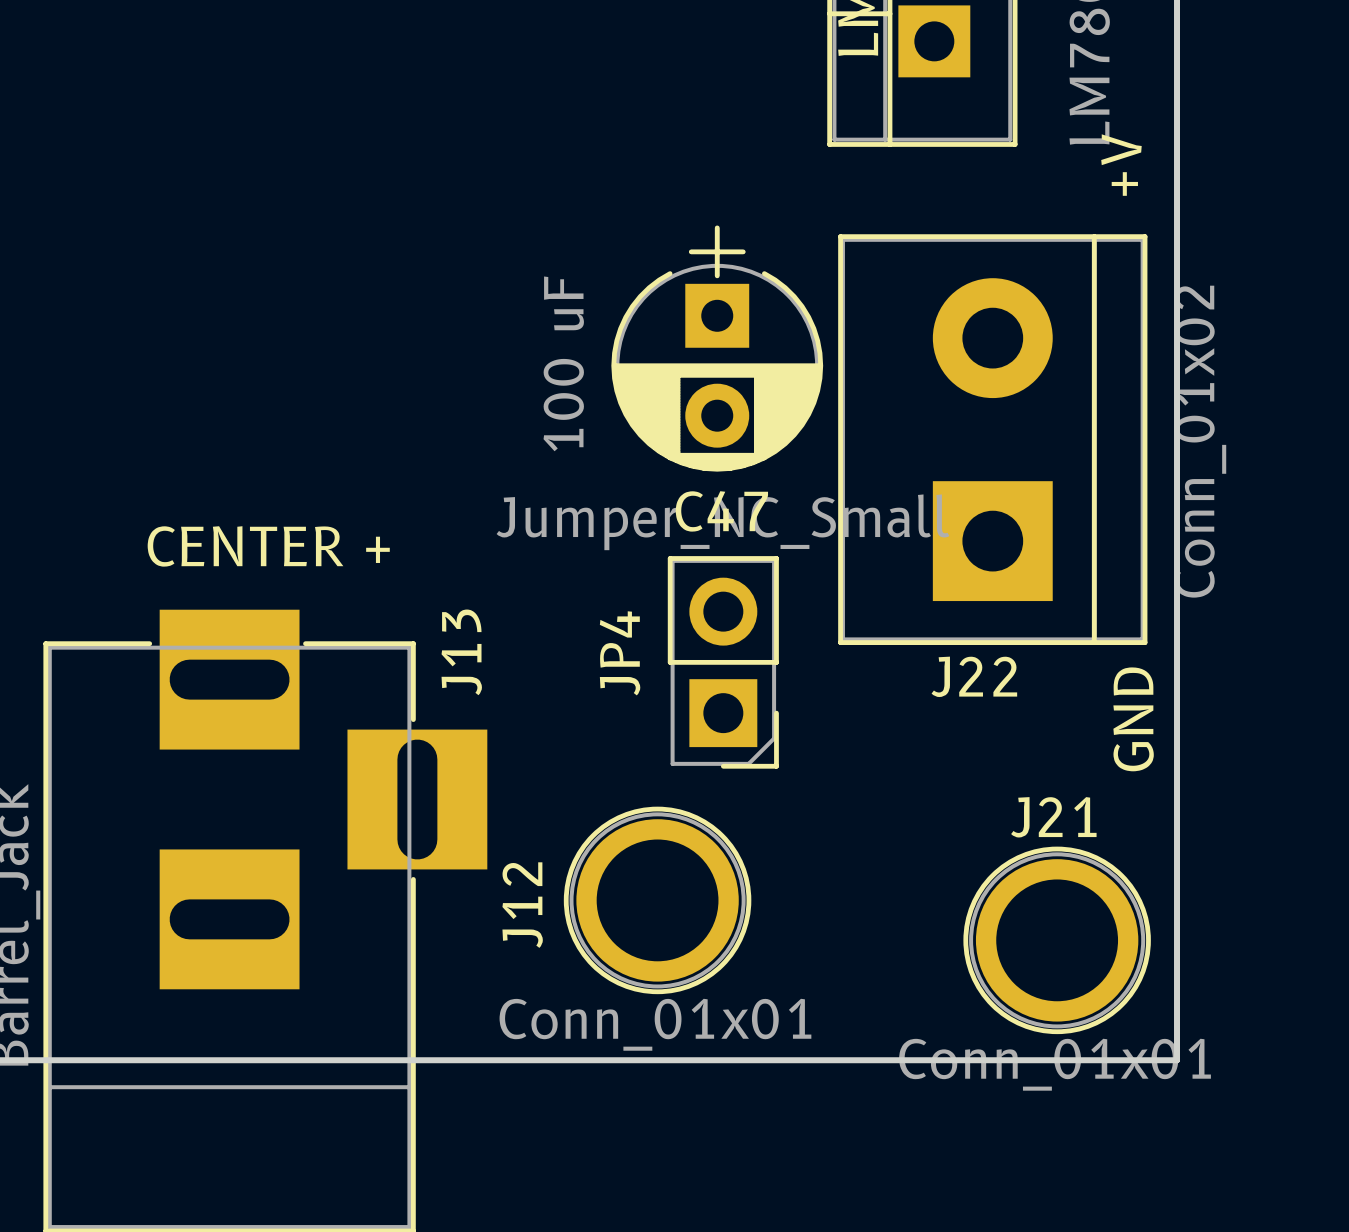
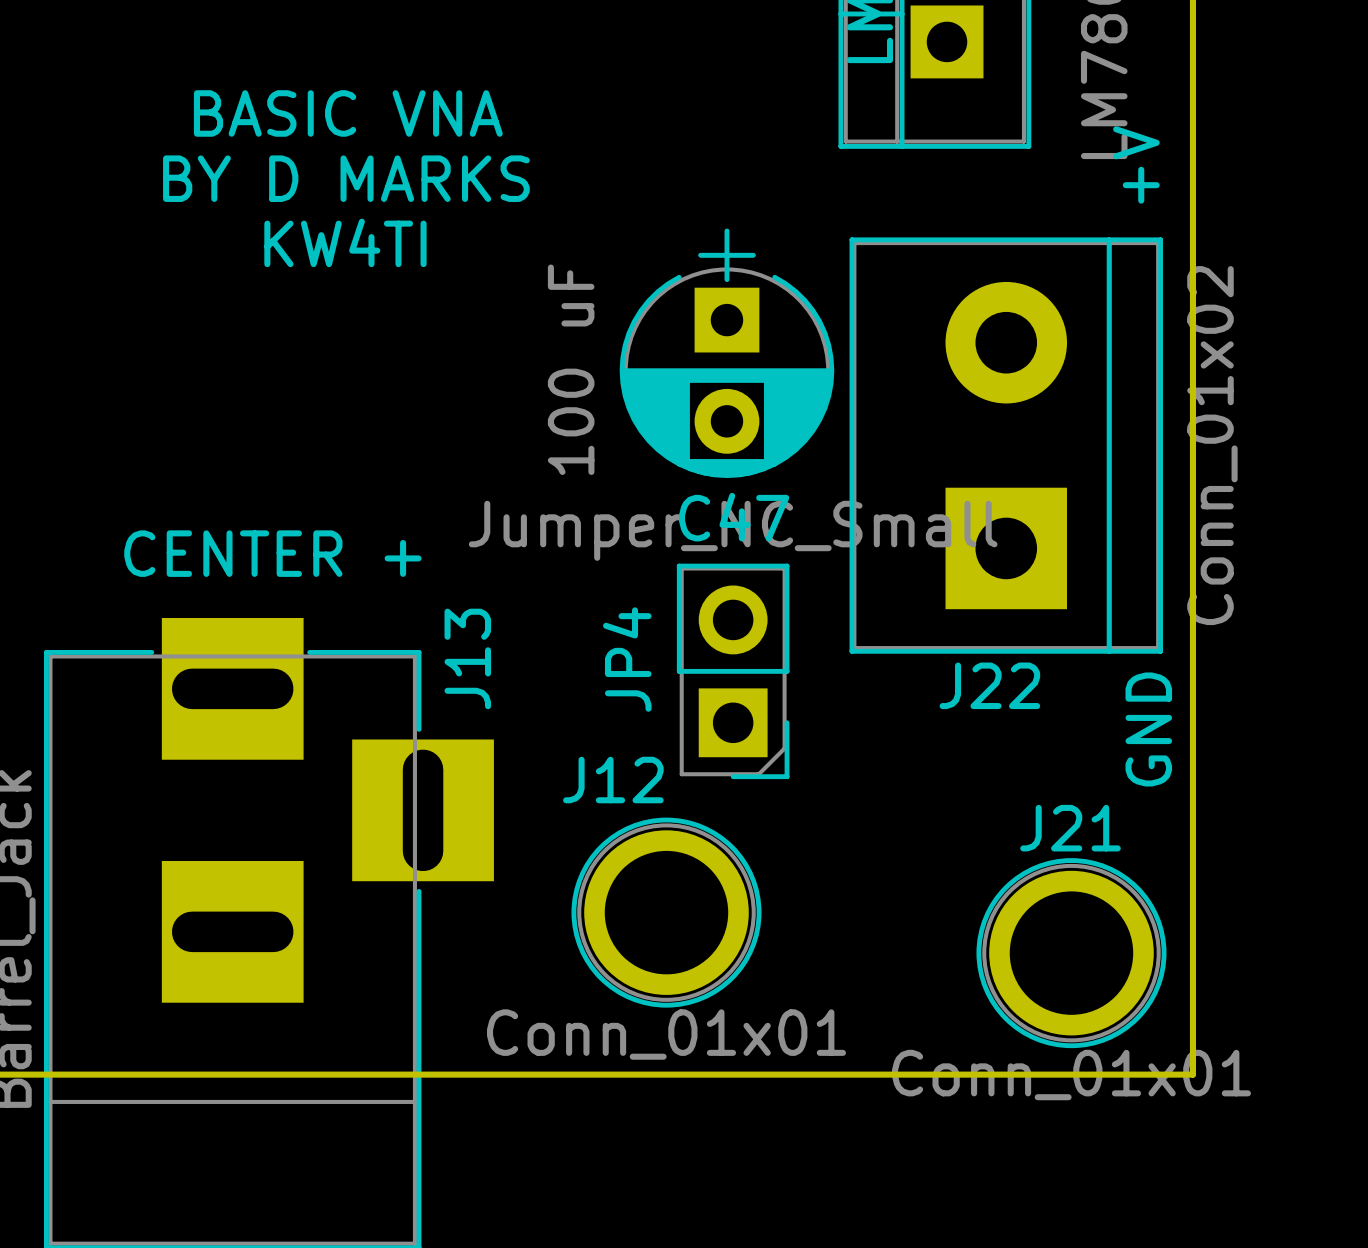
text: none -> BASIC VNA (348, 113)
text: none -> BY D MARKS (346, 178)
text: none -> KW4TI (345, 242)
J12 name rotation: 0° (522, 905) -> 90° clockwise (613, 780)
J12 name position: J12 (522, 905) -> J12 (613, 780)

